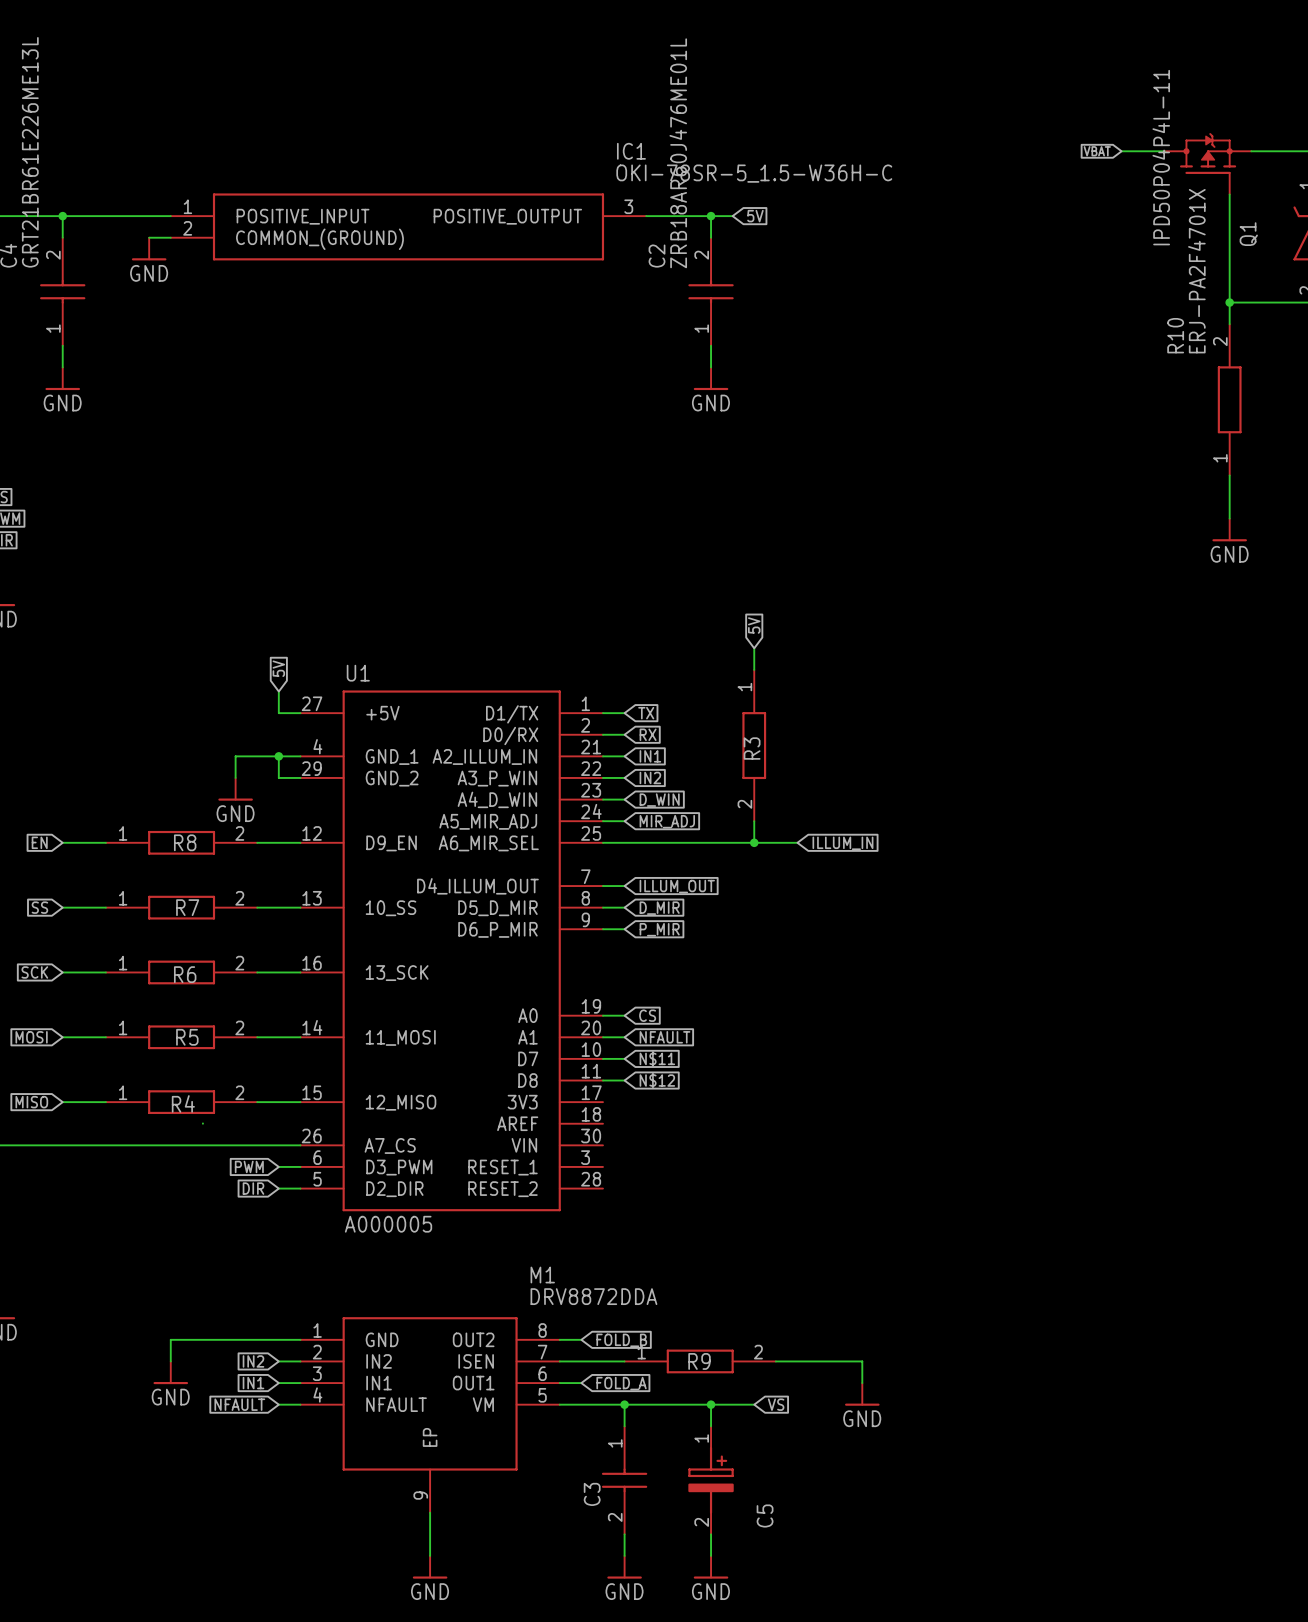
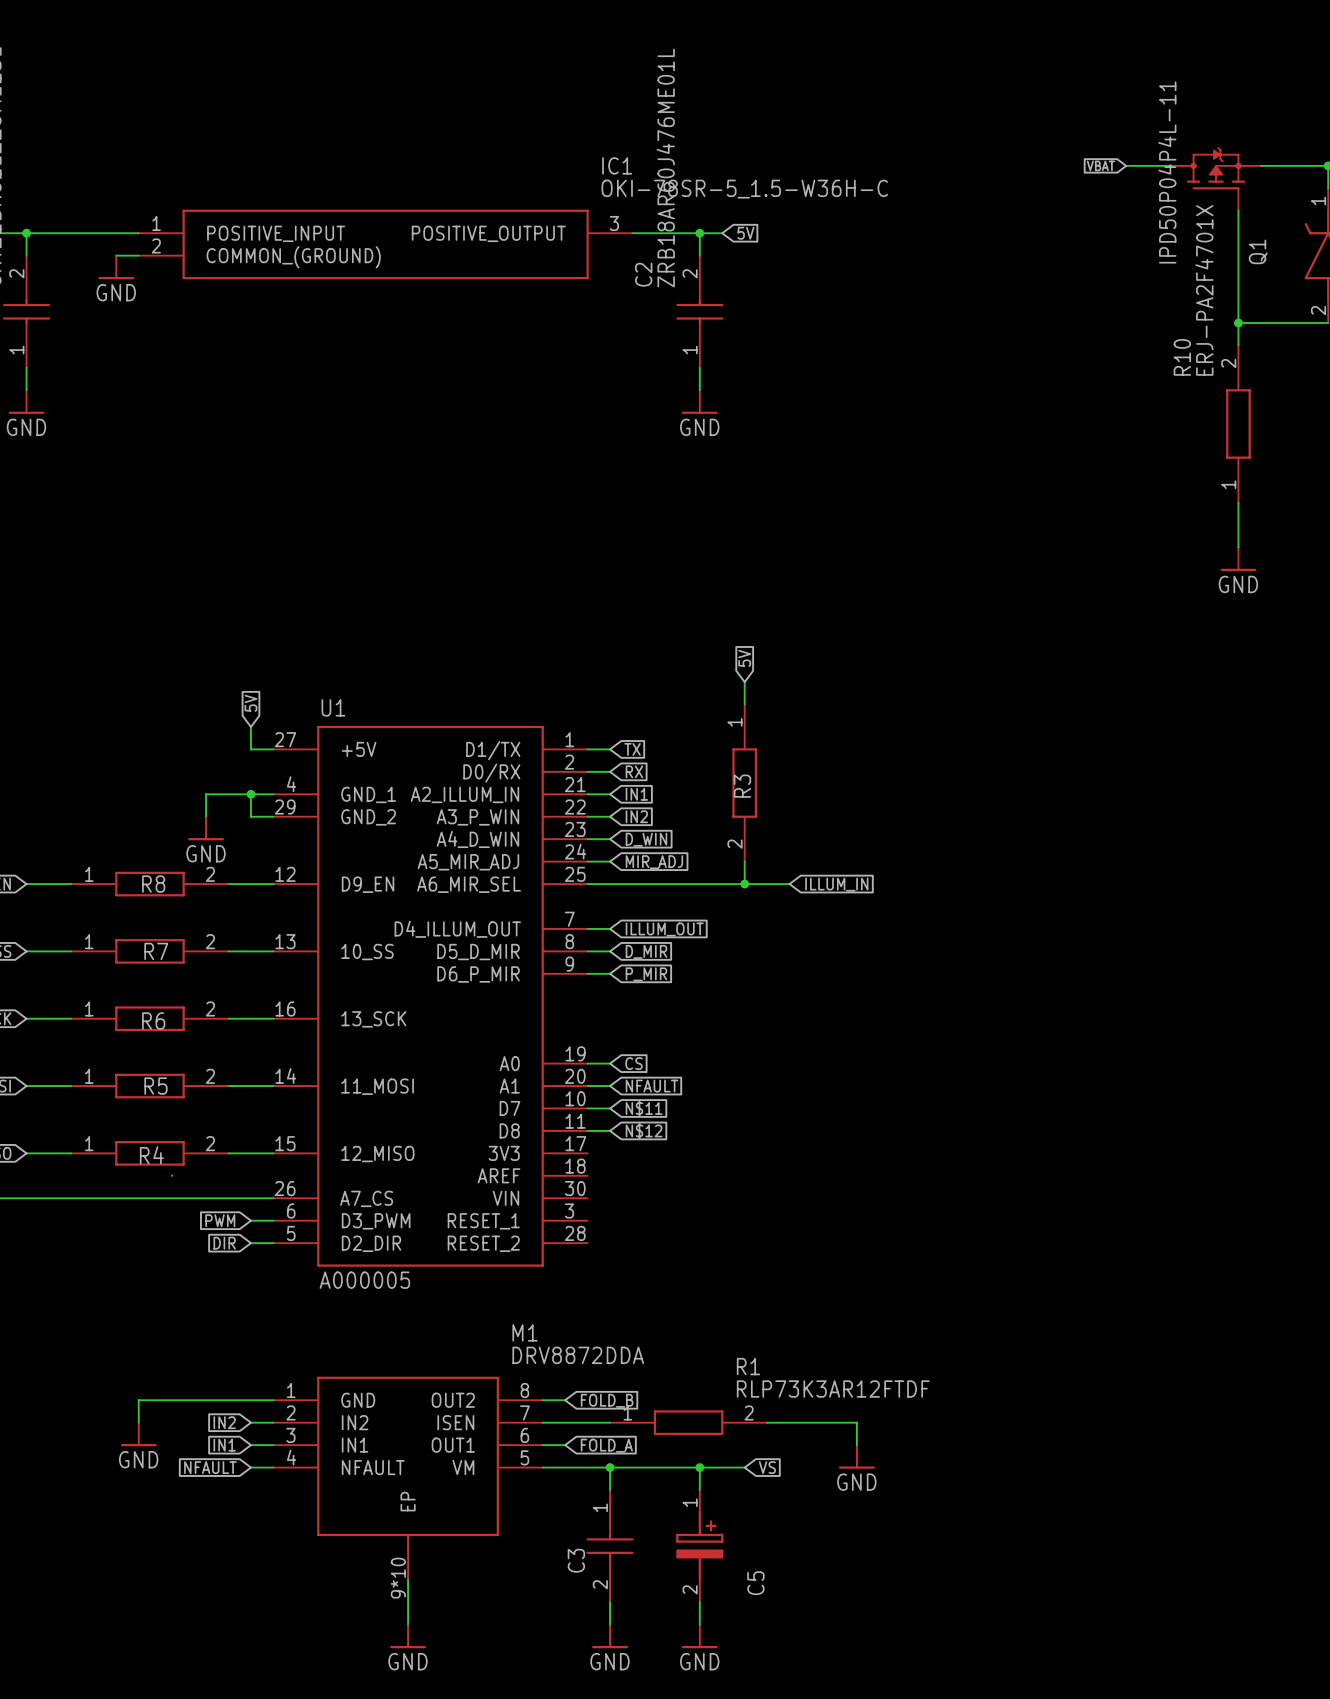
R9 value: none -> RLP73K3AR12FTDF (833, 1389)
R9 name: R9 (699, 1361) -> R1 (748, 1366)
M1 pin number: 9 (420, 1495) -> 9*10 (398, 1578)

